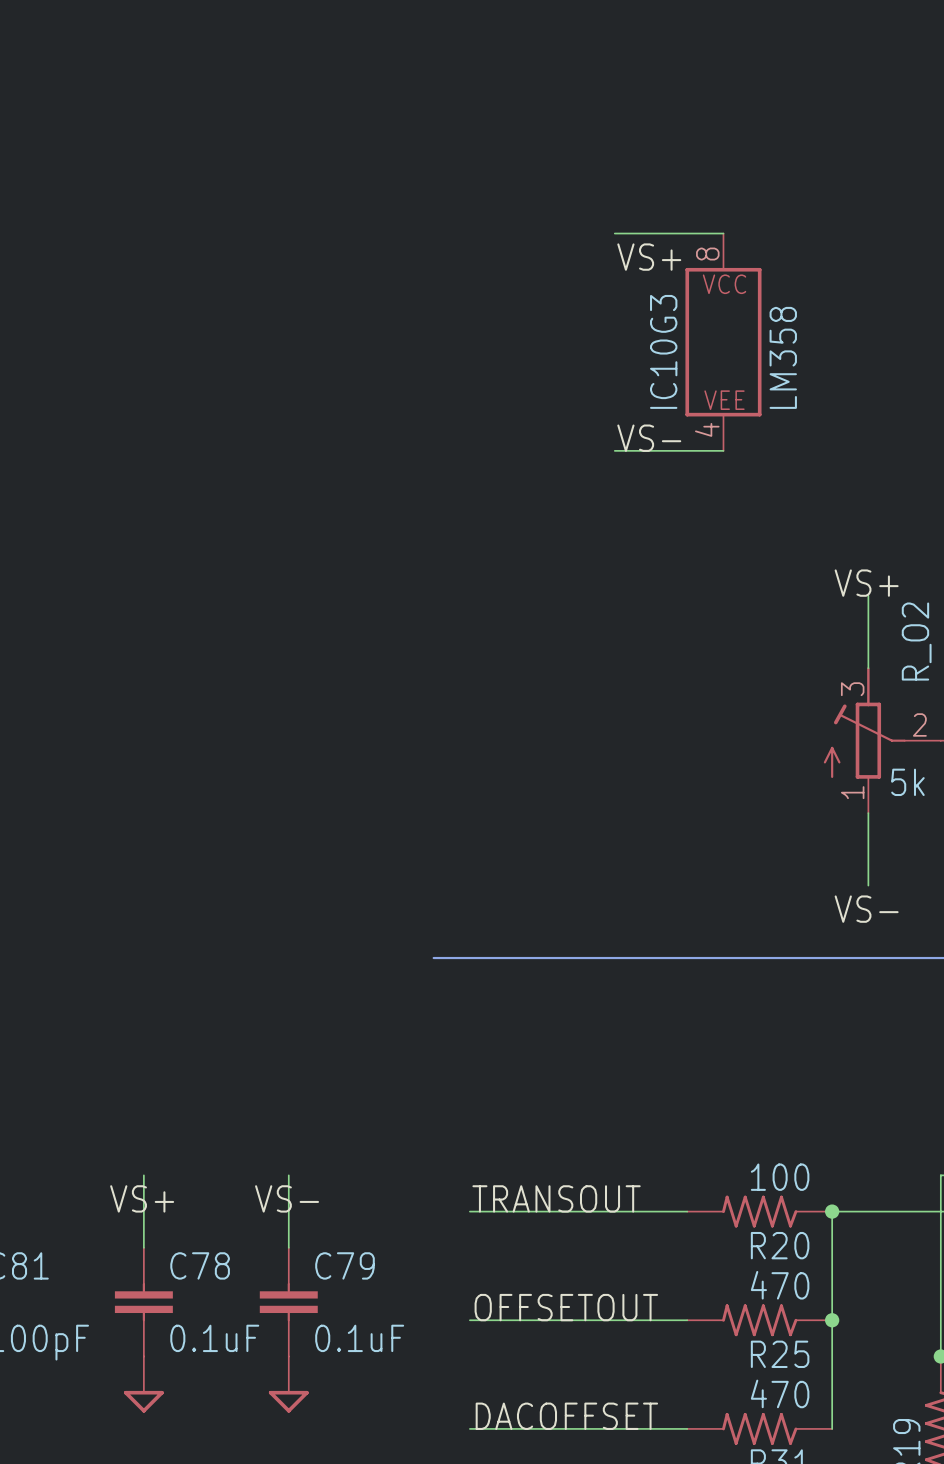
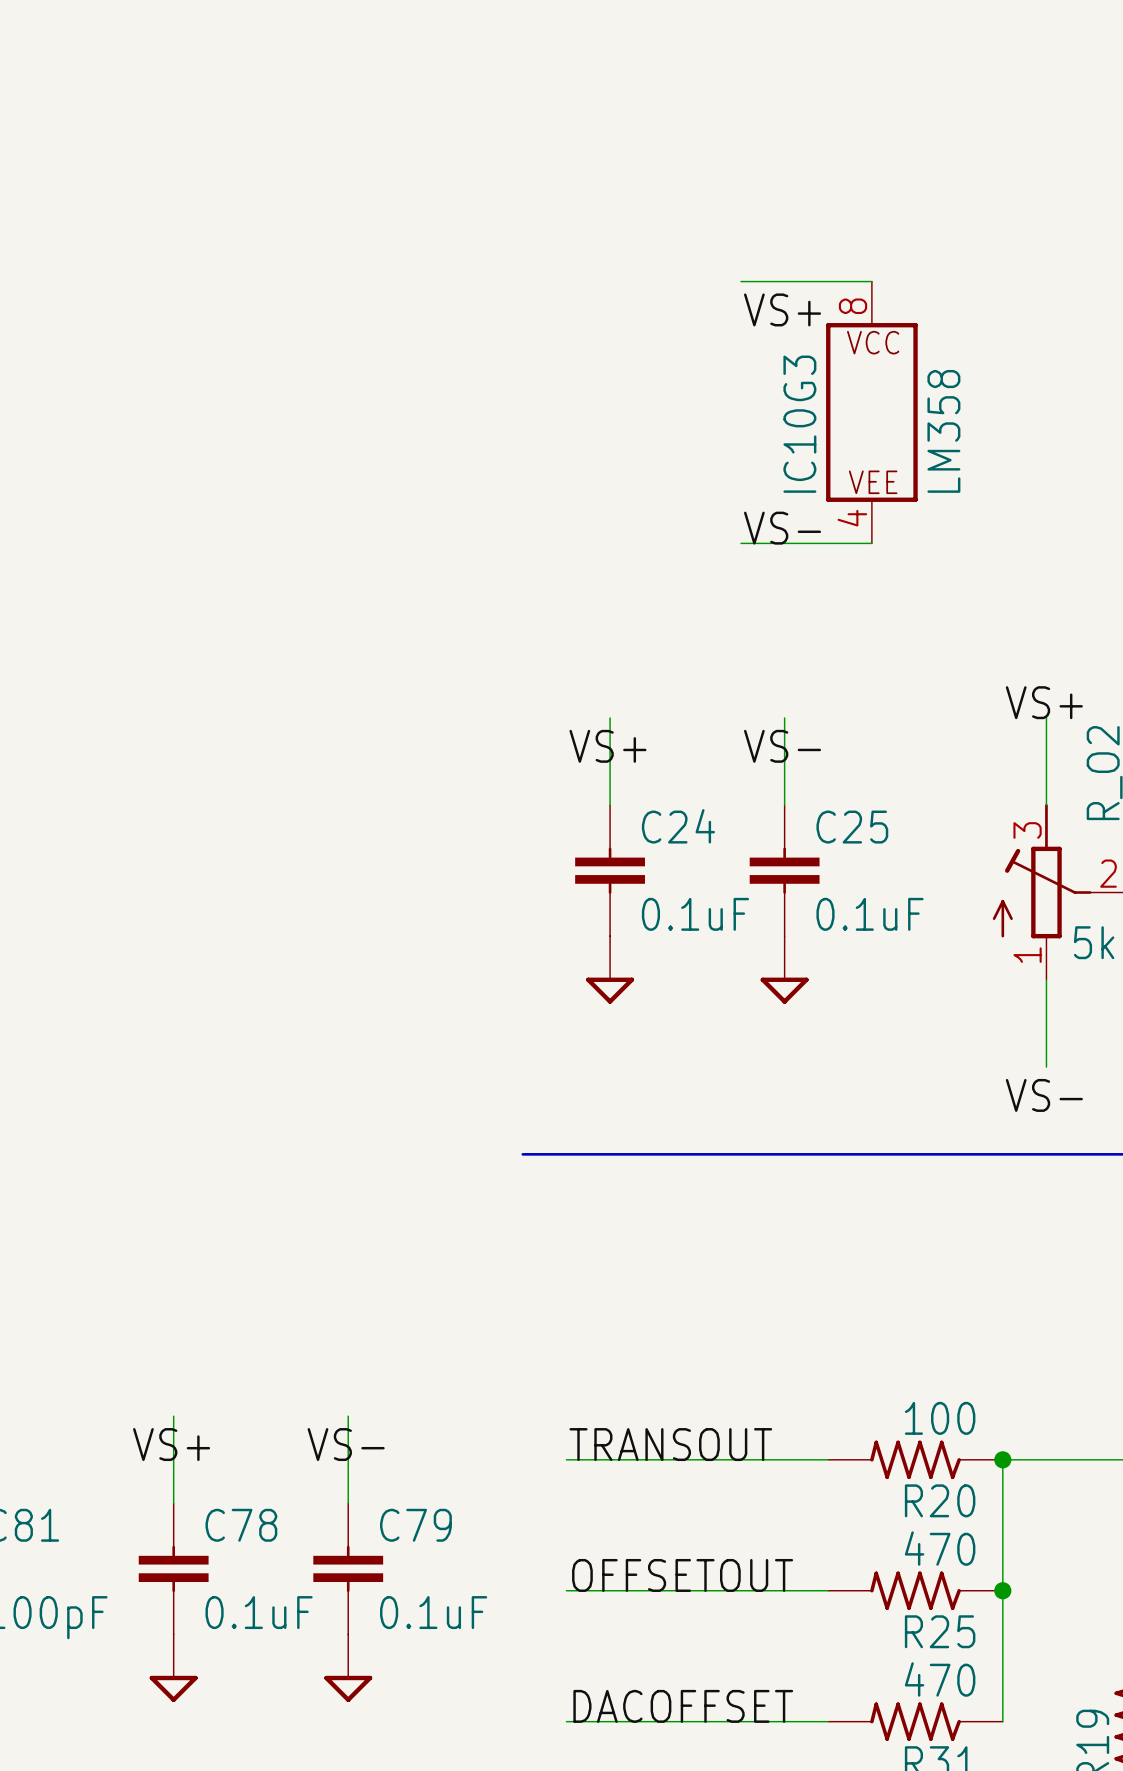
wire: none -> (610, 717) (610, 805)
wire: none -> (784, 717) (784, 805)
label: none -> VS+ (607, 746)
label: none -> VS- (782, 746)
C24: none -> 0.1uF (610, 870)
C25: none -> 0.1uF (784, 870)
power symbol: none -> (610, 969)
power symbol: none -> (784, 969)

